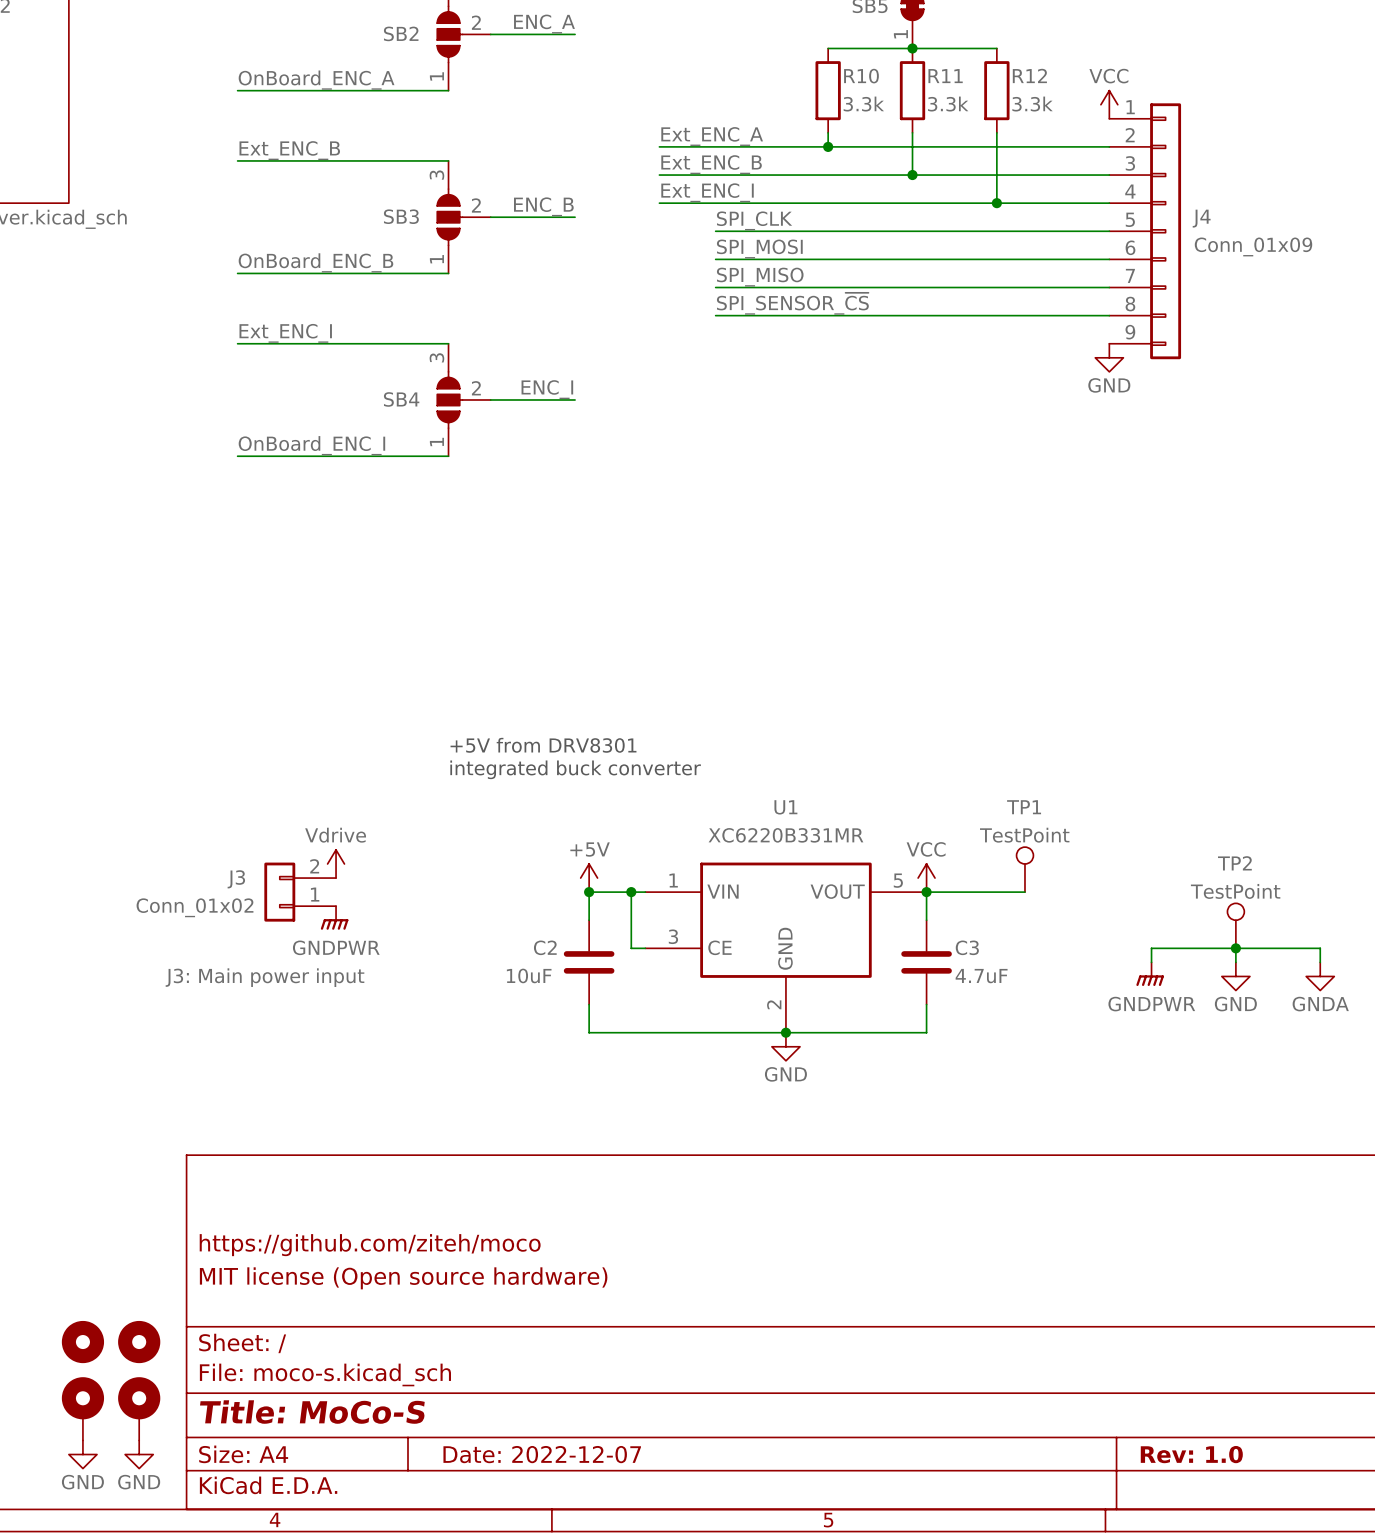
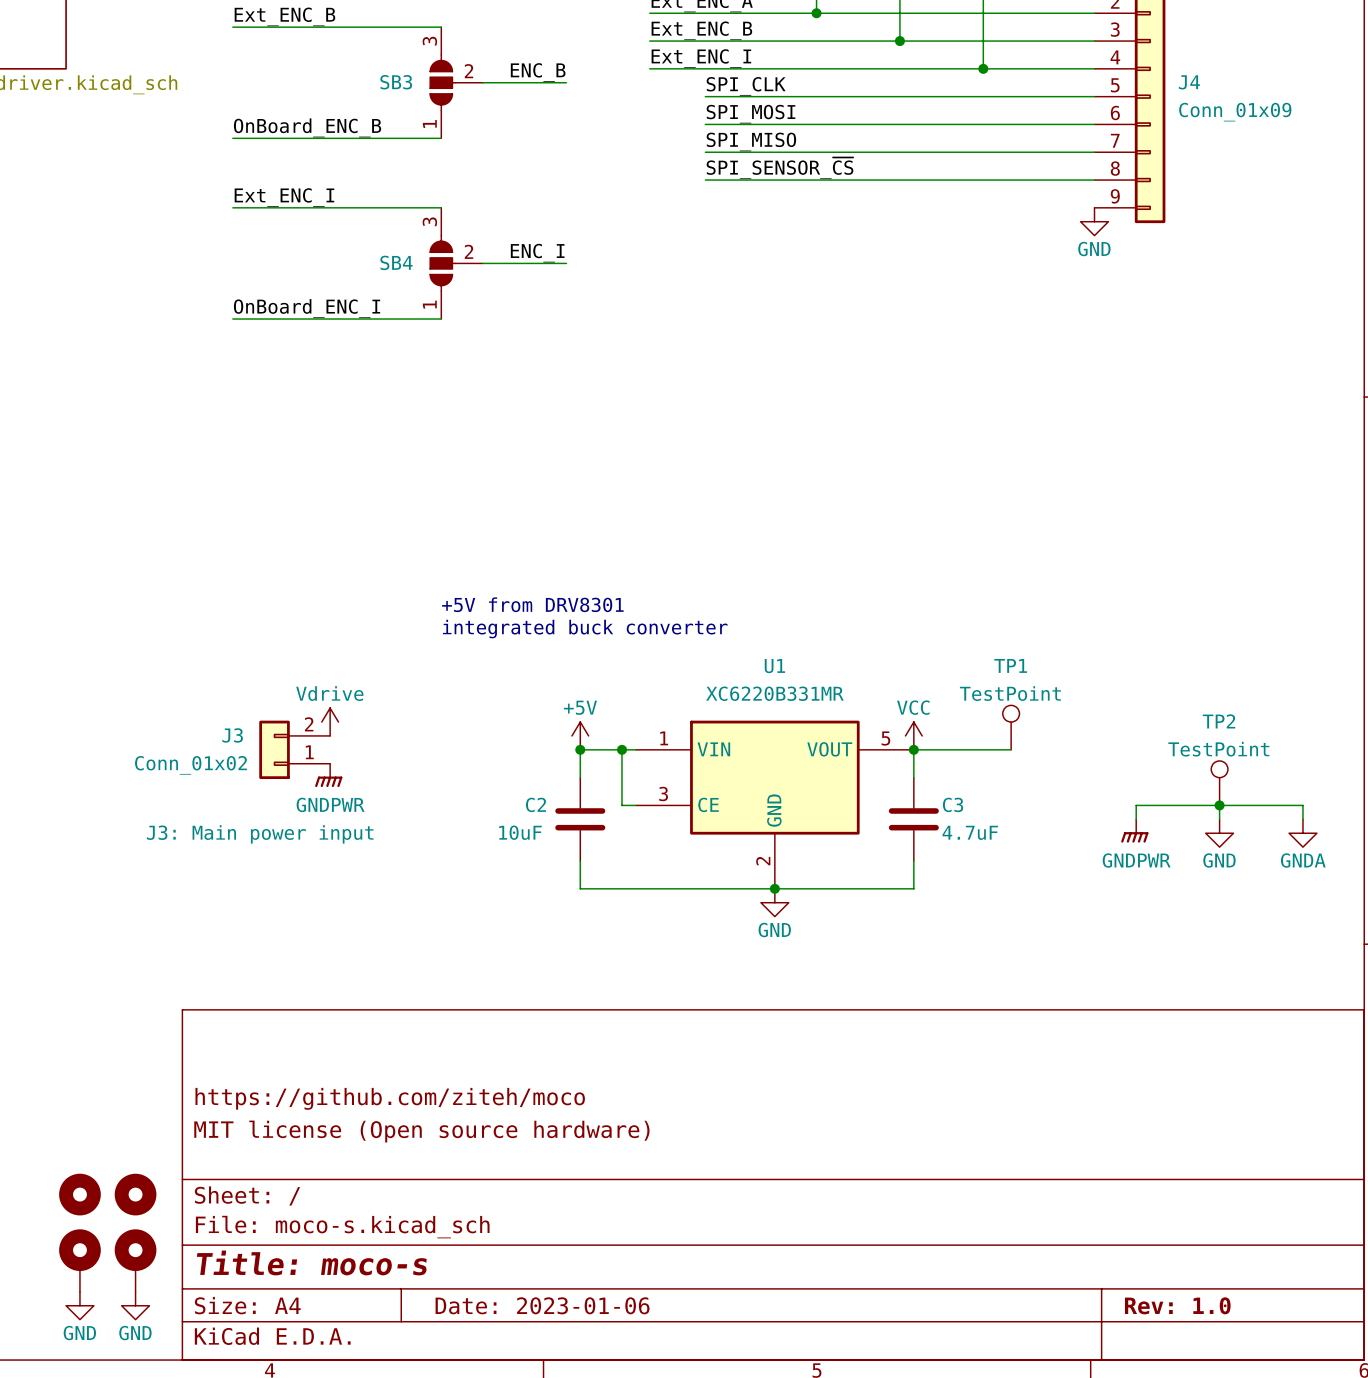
title block: Title: MoCo-S (312, 1412) -> Title: moco-s (311, 1262)
title block: Date: 2022-12-07 (542, 1454) -> Date: 2023-01-06 (542, 1305)

